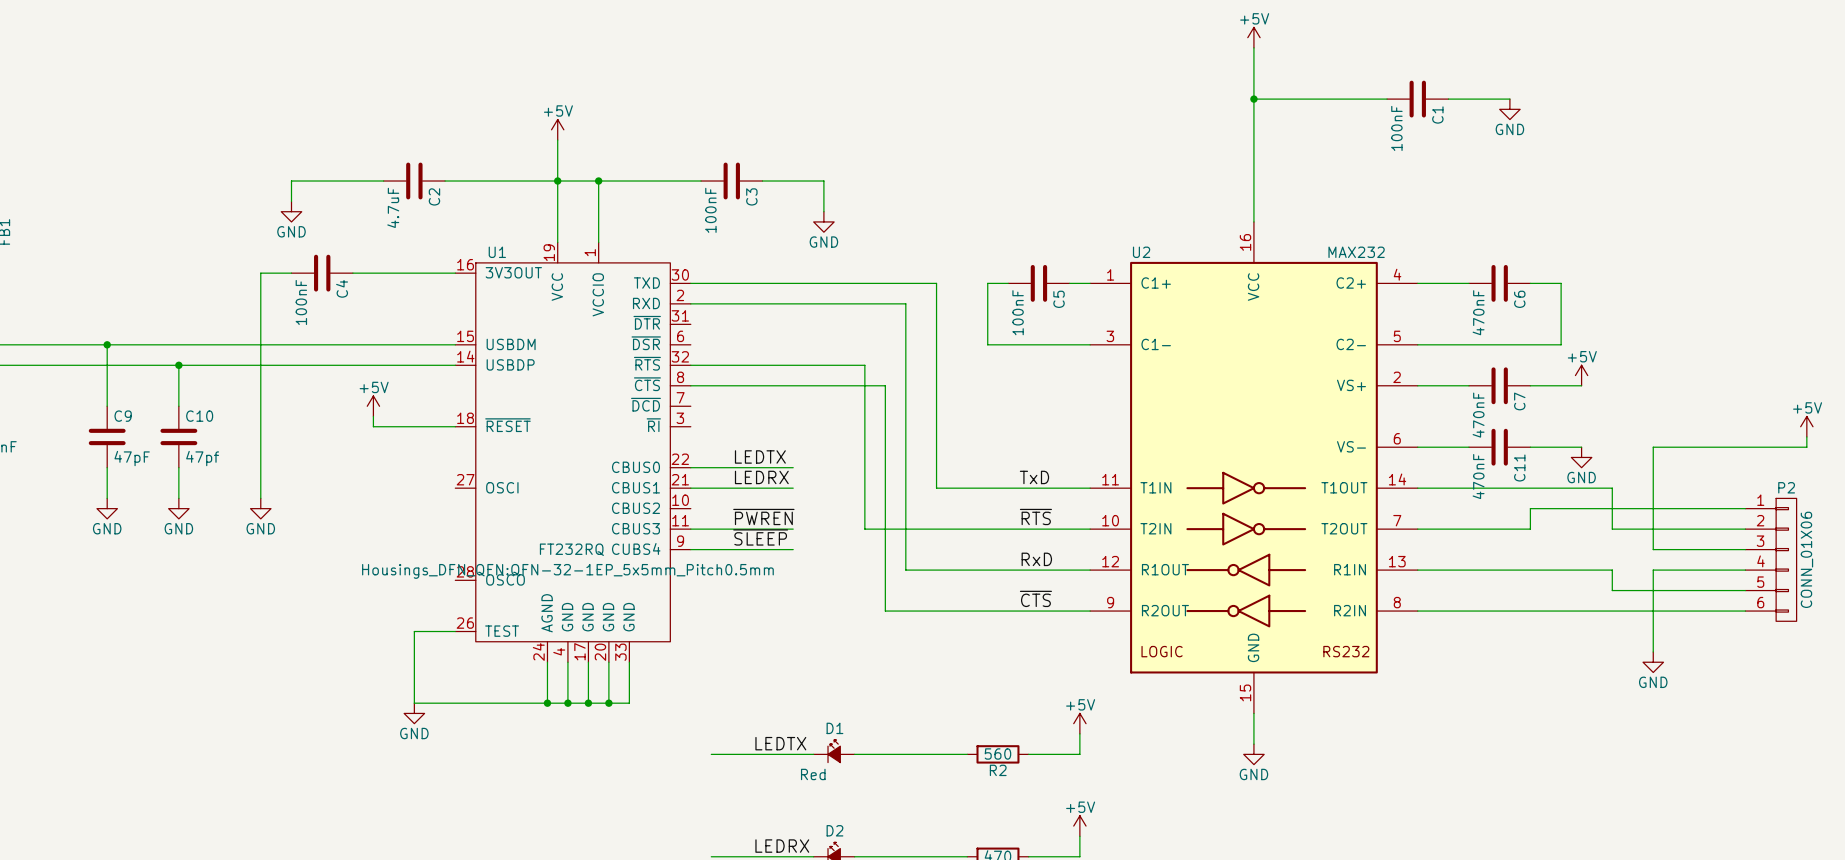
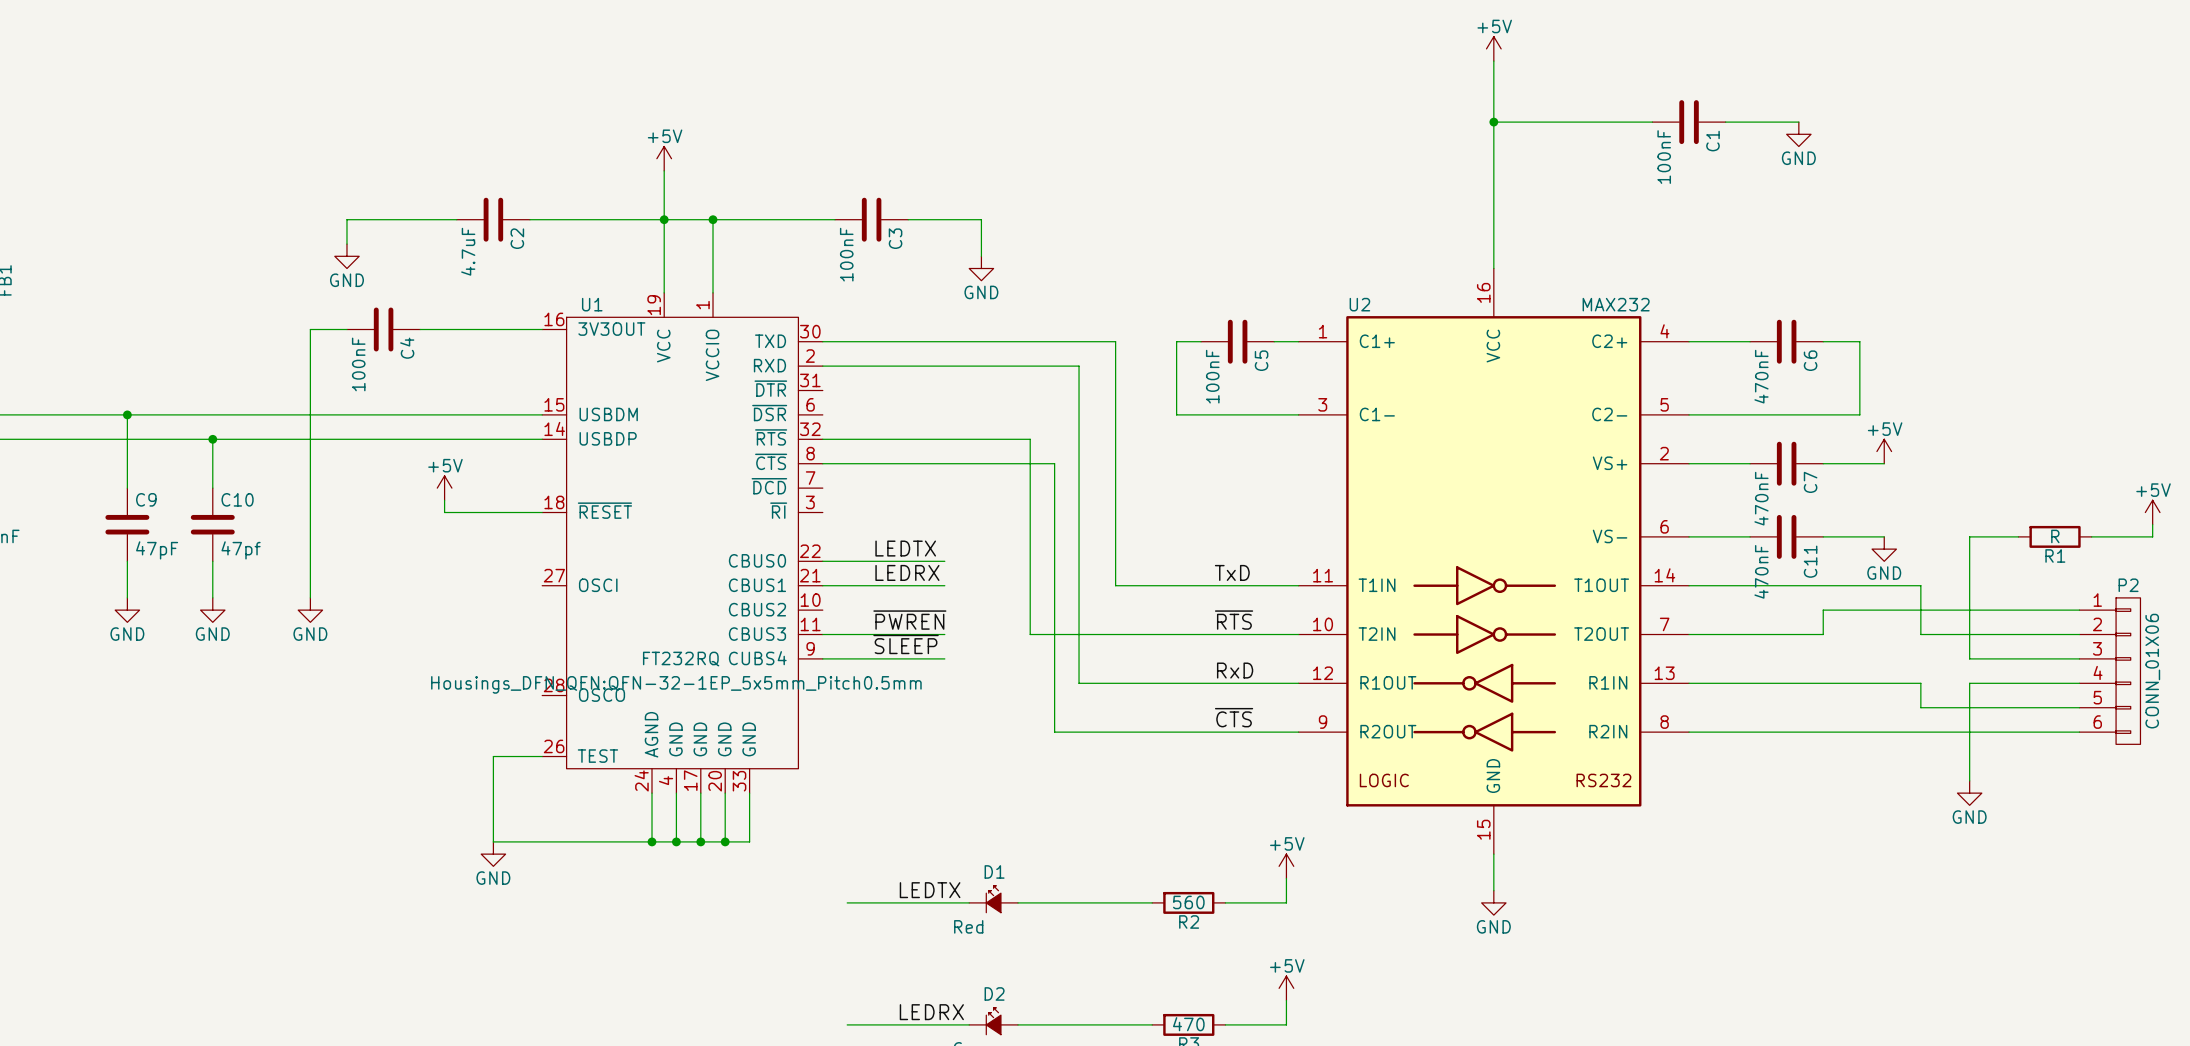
wire: (1694, 447) (1755, 447) -> none
R1: none -> R (2055, 536)

